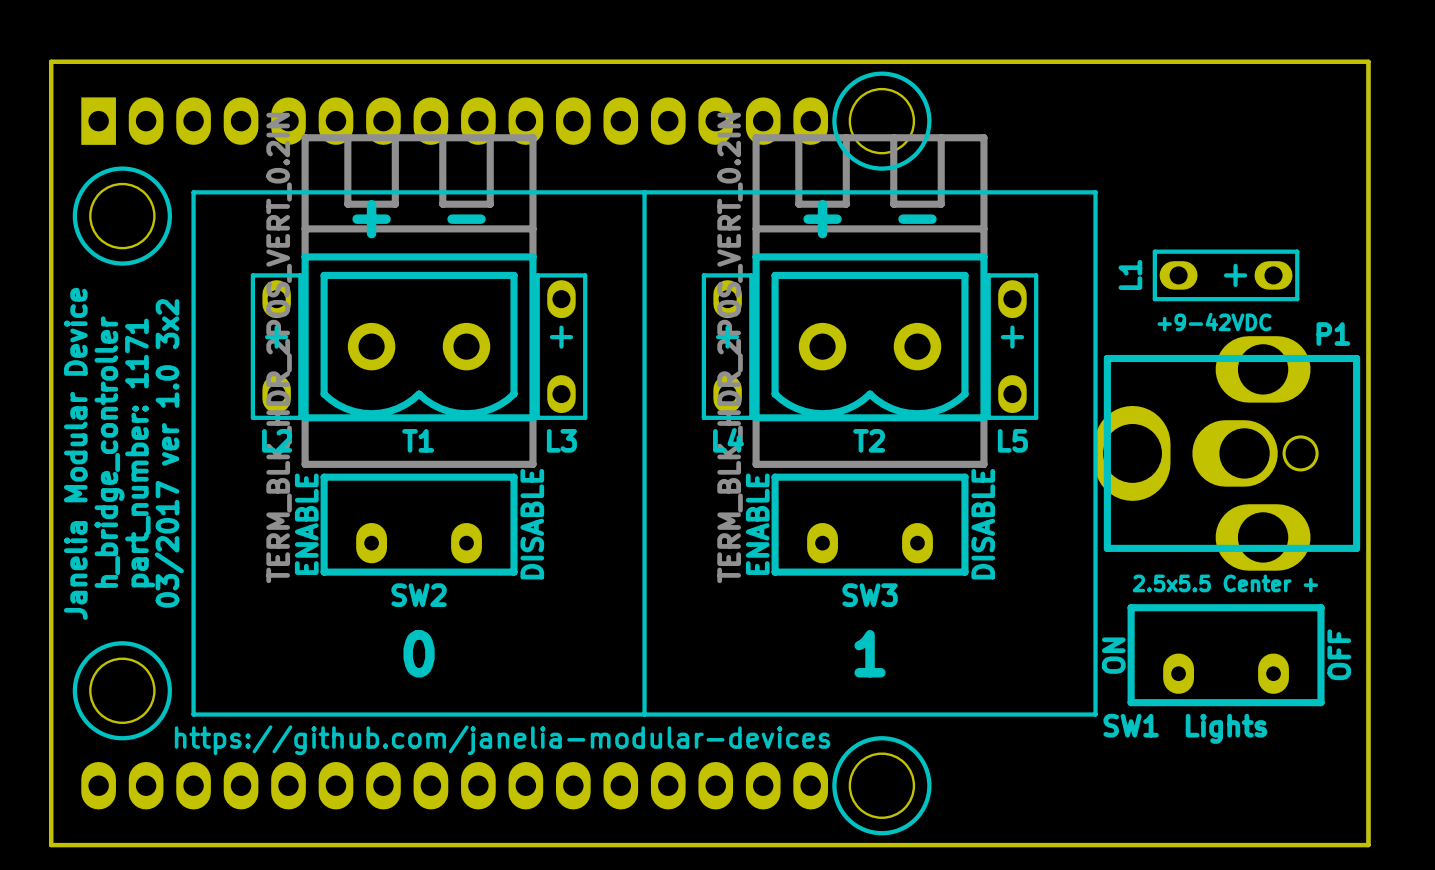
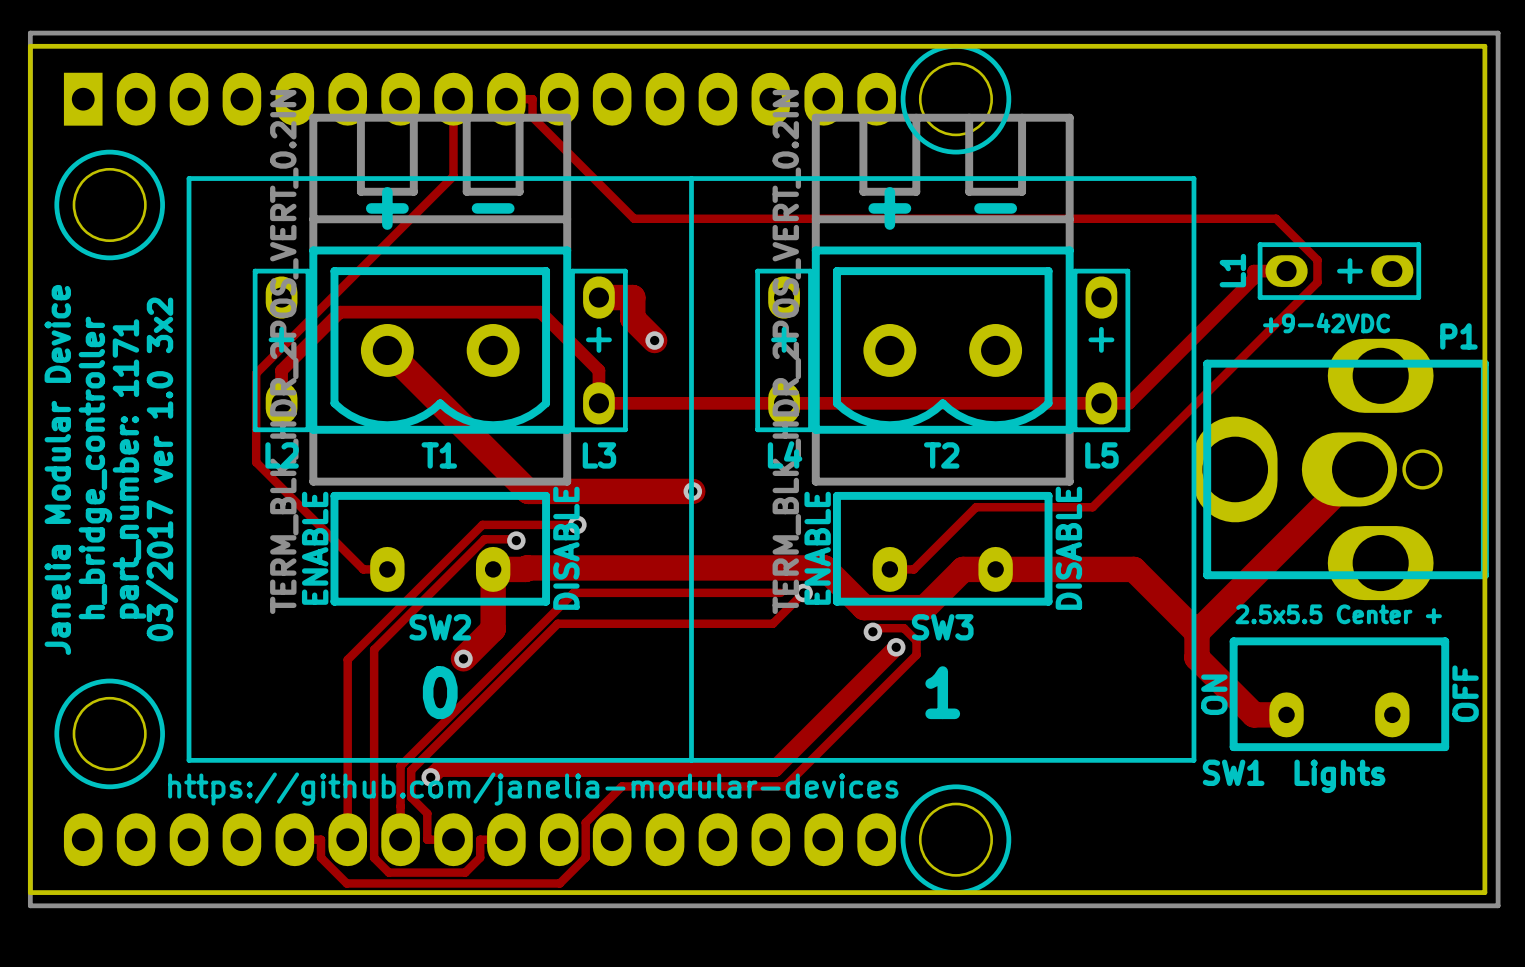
board edge: (51, 73) (51, 61) (1368, 61) (1368, 845) (51, 845) (51, 833) -> (30, 46) (1484, 46) (1484, 892) (30, 892)
track: none -> (453, 99) (453, 176) (256, 373) (256, 462) (363, 569) (387, 569)
track: none -> (506, 99) (532, 99) (532, 117) (634, 218) (1276, 218) (1317, 260) (1317, 282) (1092, 507) (976, 507) (913, 569) (889, 569)
track: none -> (1286, 271) (1253, 271) (1253, 278) (1128, 403) (598, 403) (598, 370) (540, 312) (339, 312) (281, 370) (281, 403)
track: none -> (598, 297) (632, 297) (632, 318) (654, 340)
via: none -> (654, 340)
track: none -> (387, 350) (528, 491) (692, 491)
track: none -> (1360, 469) (1196, 632)
via: none -> (692, 491)
track: none -> (577, 524) (482, 524) (347, 659) (347, 839)
via: none -> (577, 524)
track: none -> (516, 540) (484, 539) (374, 649) (374, 857) (388, 872) (465, 872) (480, 857) (480, 839) (506, 839)
via: none -> (516, 540)
track: none -> (780, 592) (573, 592) (400, 765) (400, 839)
track: none -> (803, 593) (772, 623) (557, 623) (411, 770) (411, 797) (427, 813) (427, 839) (453, 839)
via: none -> (803, 593)
track: none -> (872, 631) (876, 628) (903, 628) (916, 640) (916, 654) (784, 786) (621, 786) (585, 822) (585, 857) (559, 883) (346, 883) (320, 857) (320, 839) (294, 839)
via: none -> (872, 631)
track: none -> (1196, 632) (1196, 657) (1254, 714) (1286, 714)
track: none -> (1196, 632) (1133, 569) (963, 569) (924, 607) (864, 607) (824, 567) (527, 567) (493, 569) (493, 629) (463, 658)
track: none -> (896, 647) (775, 768) (439, 768) (430, 777)
via: none -> (896, 647)
via: none -> (463, 658)
via: none -> (430, 777)

